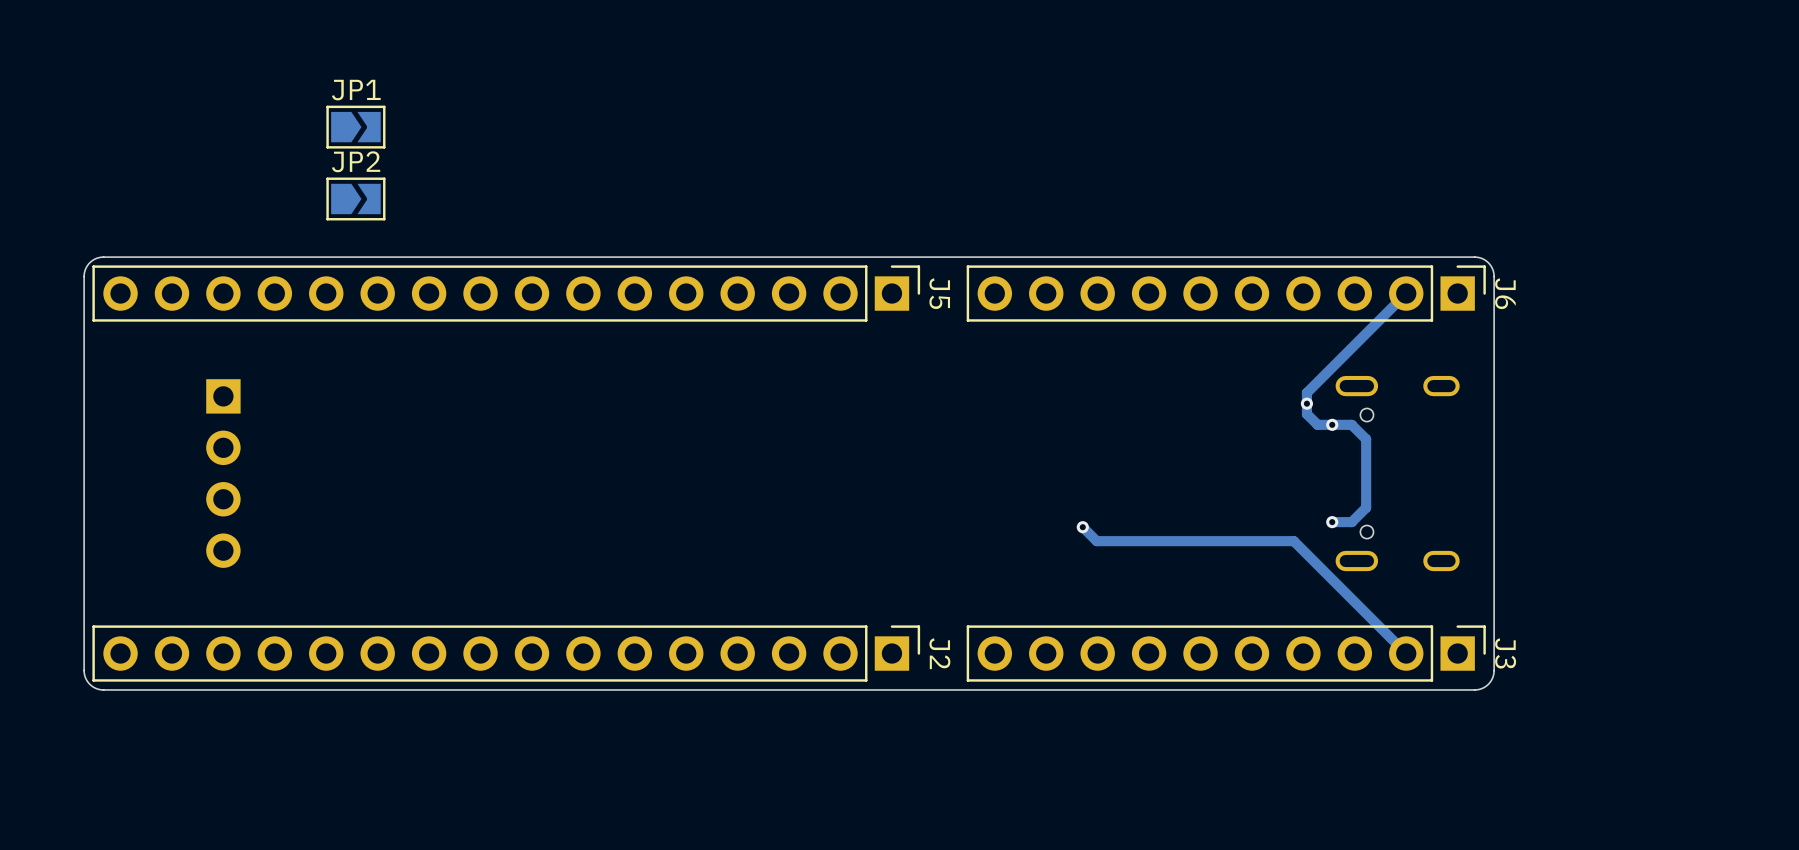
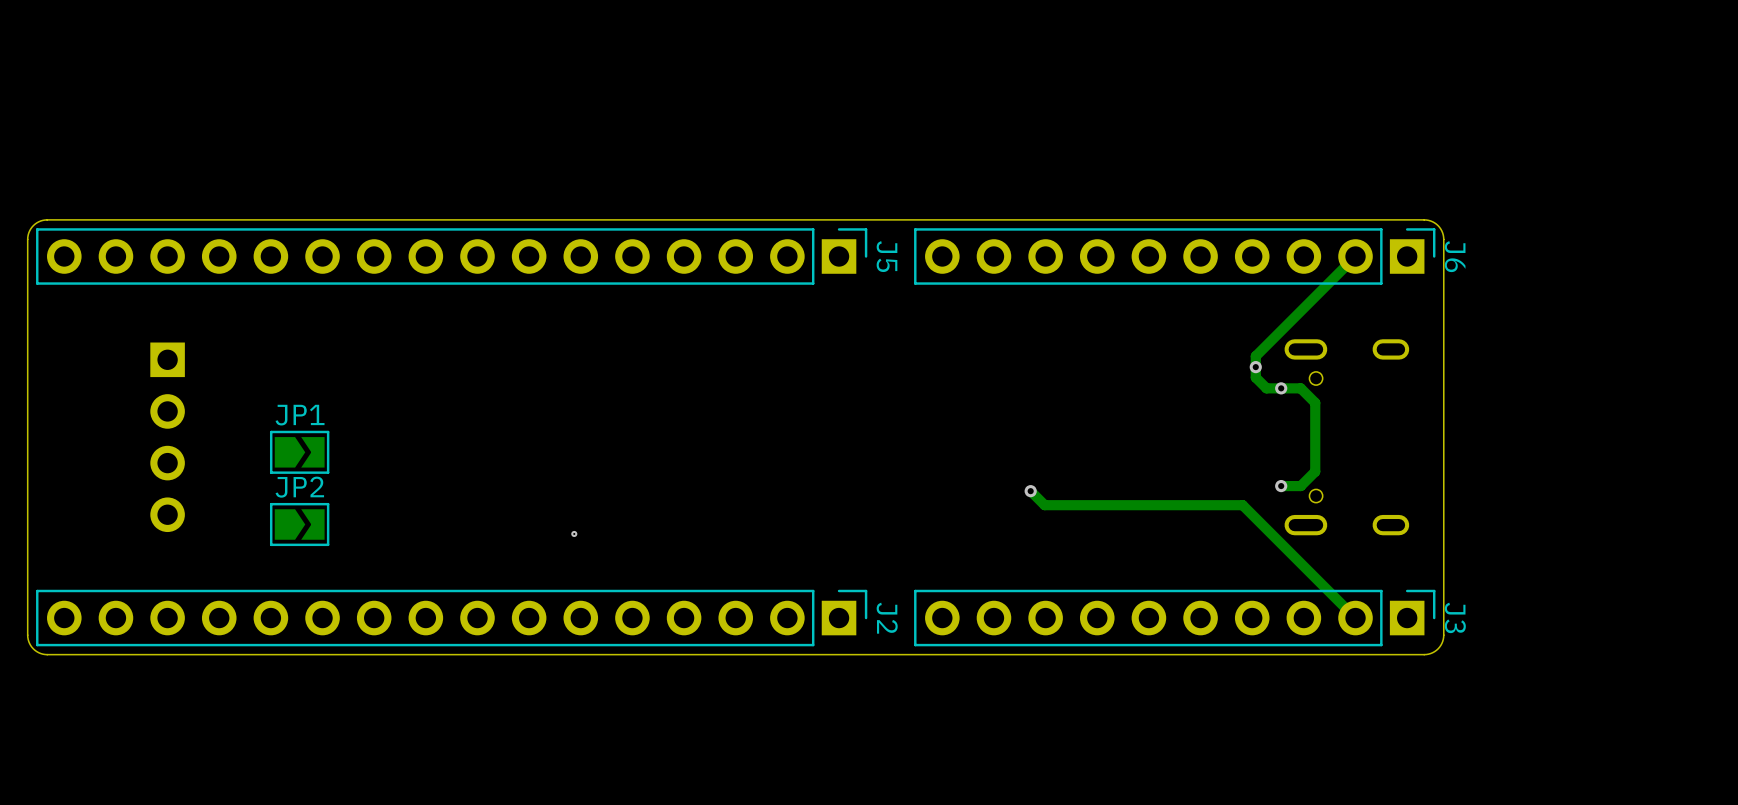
JP1 position: (355, 127) -> (299, 452)
JP2 position: (355, 198) -> (299, 524)
via: none -> (574, 533)

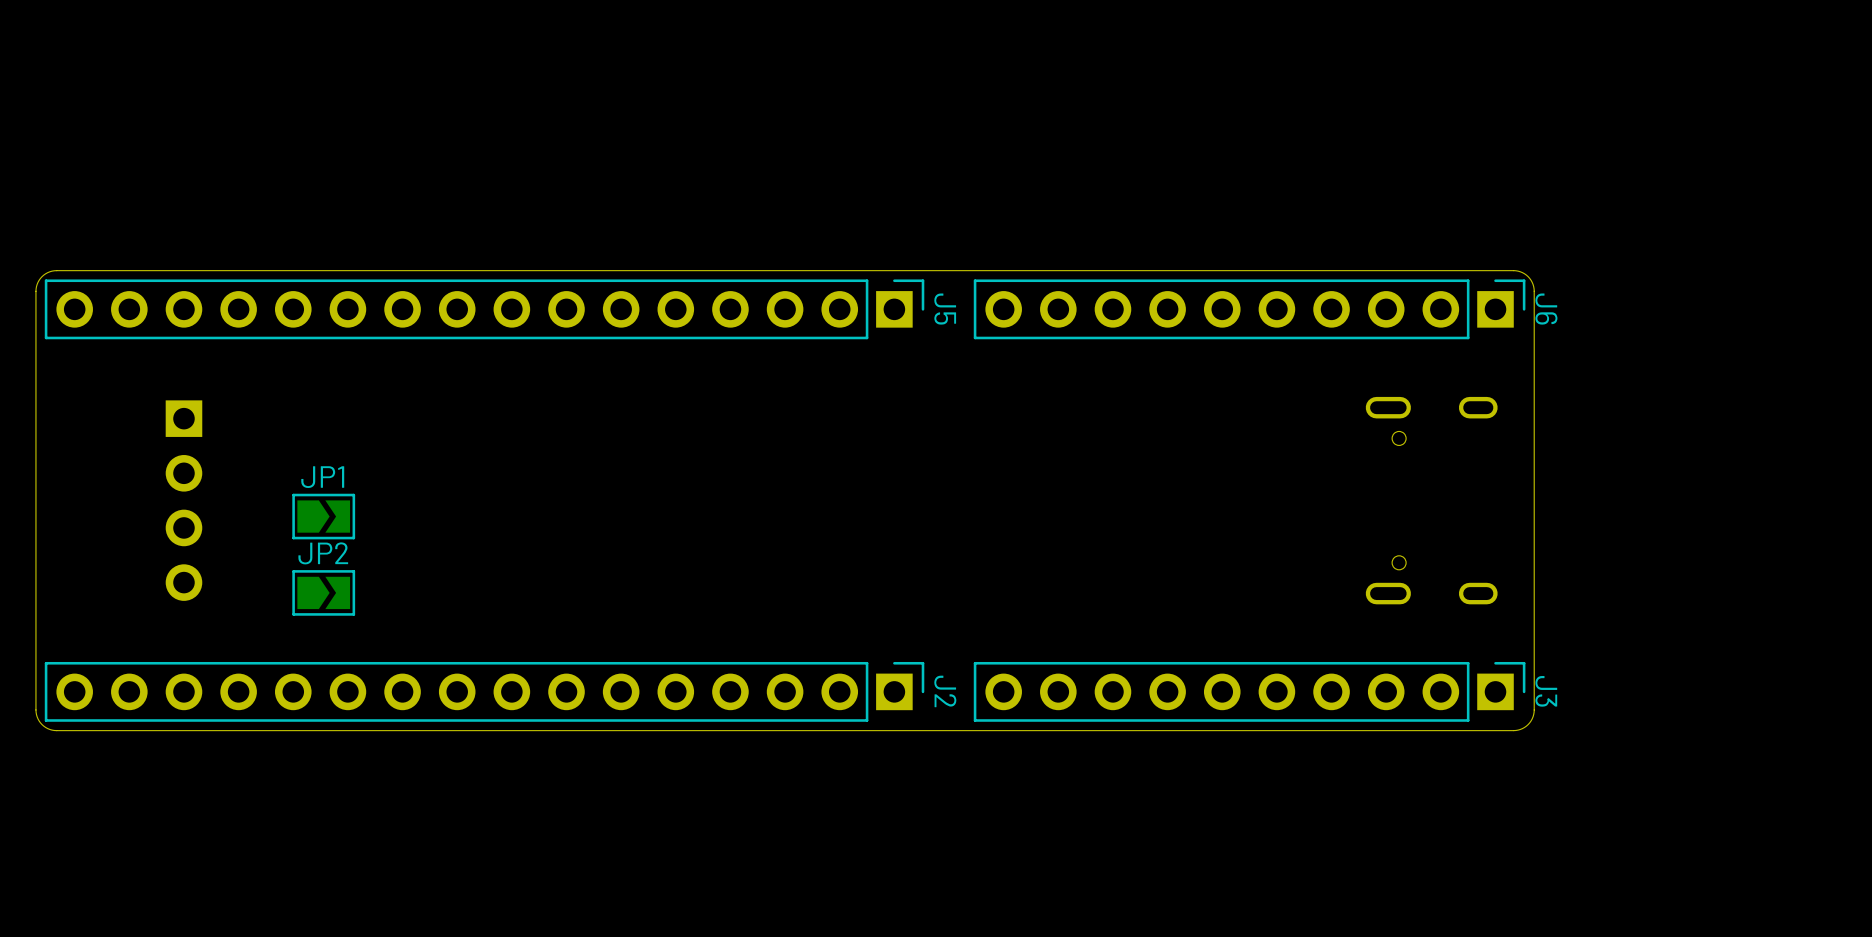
track: (1355, 256) (1255, 356) (1255, 377) (1266, 388) (1300, 388) (1315, 402) (1315, 471) (1300, 486) (1281, 486) -> none
via: (1255, 367) -> none
via: (1281, 388) -> none
via: (1281, 486) -> none
track: (1030, 491) (1044, 505) (1242, 505) (1355, 618) -> none
via: (1030, 491) -> none
via: (574, 533) -> none

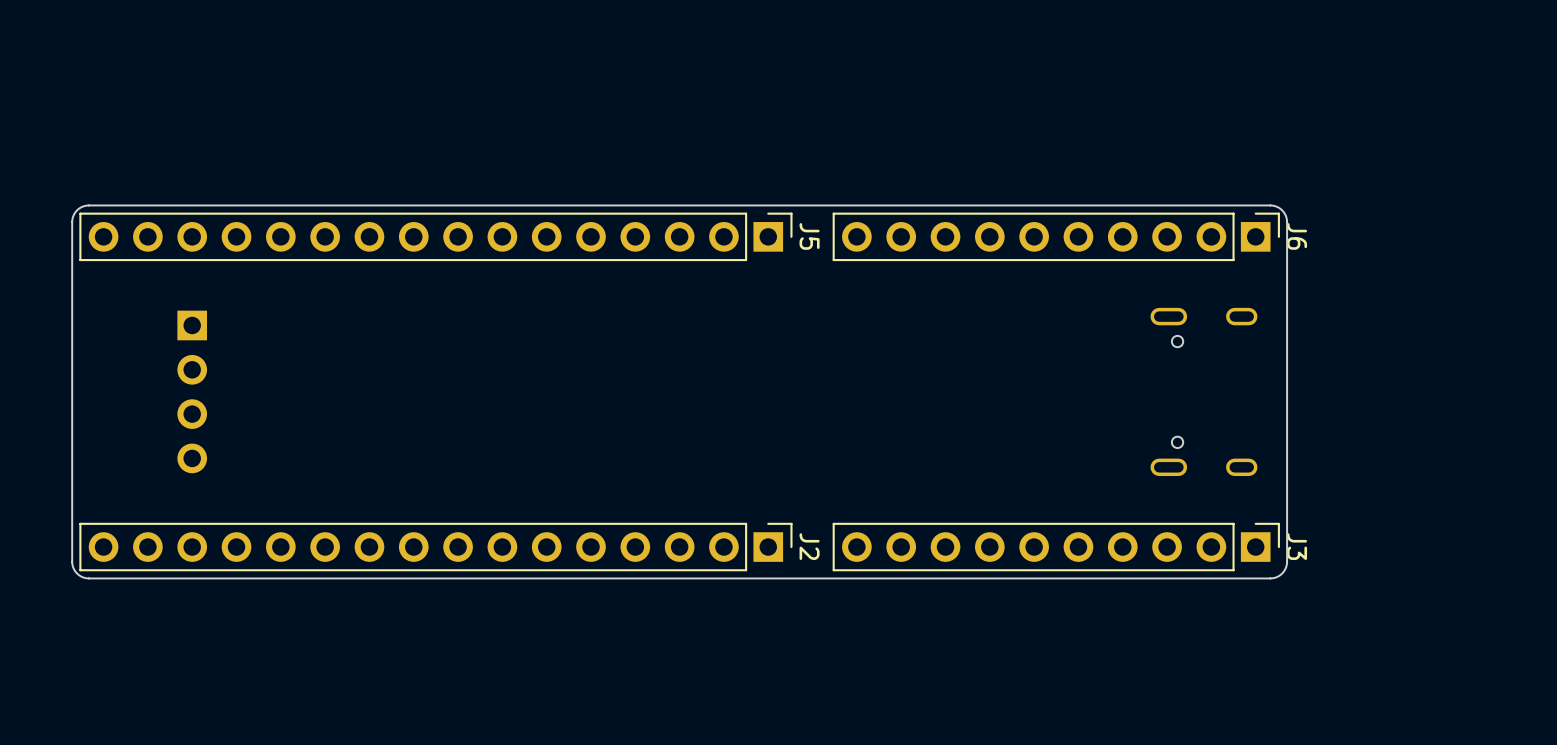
JP1: (323, 516) -> none
JP2: (323, 592) -> none

